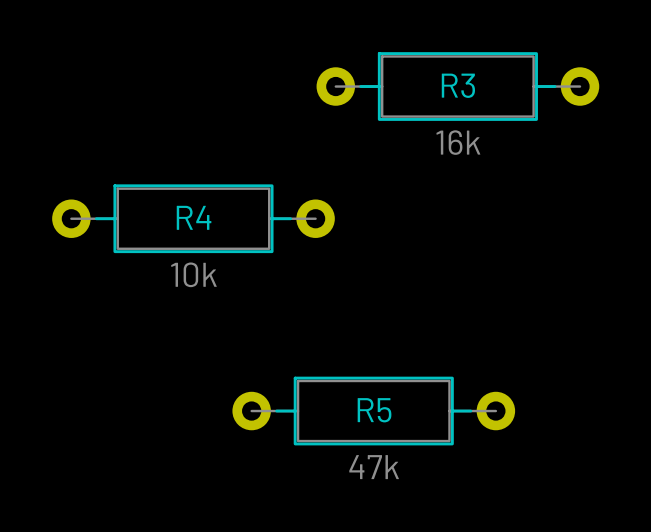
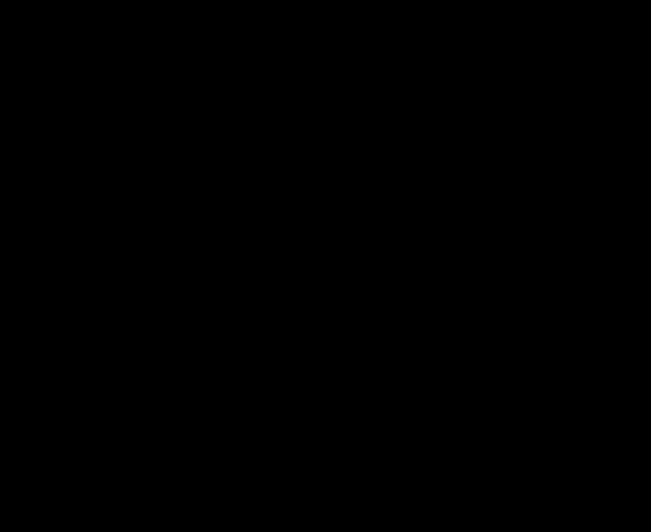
R3: 16k (457, 86) -> none
R4: 10k (193, 218) -> none
R5: 47k (373, 411) -> none

